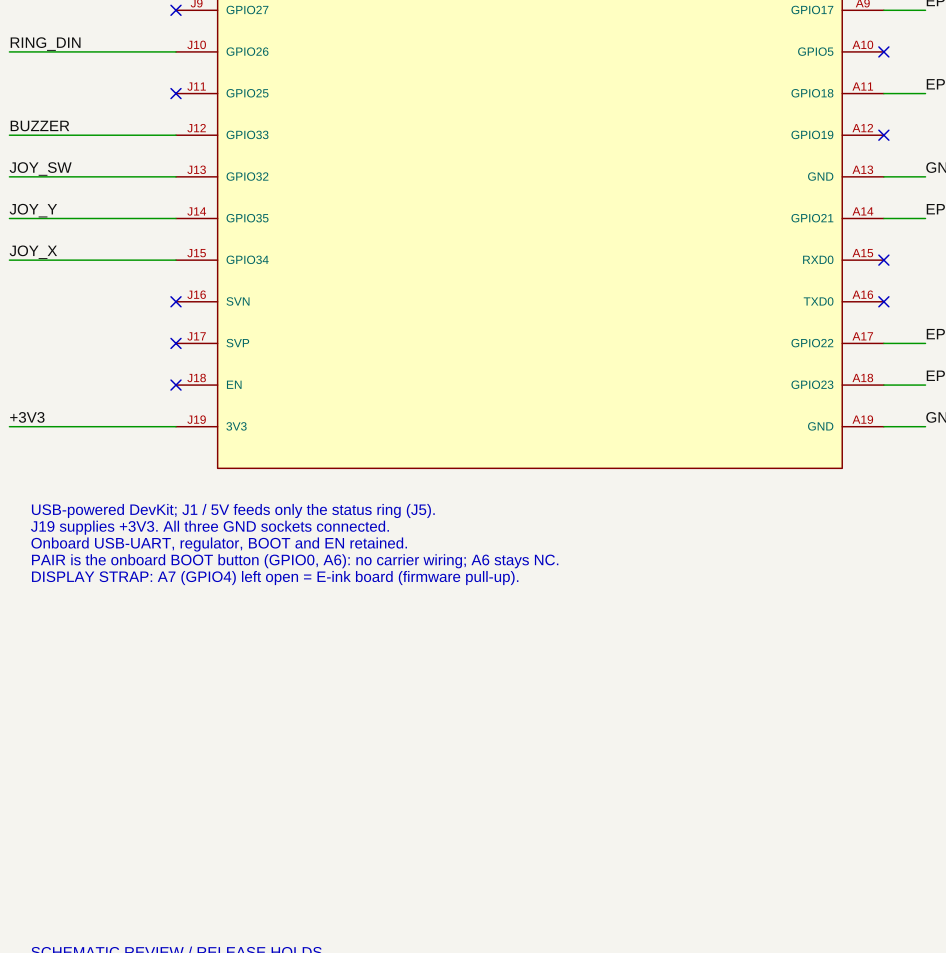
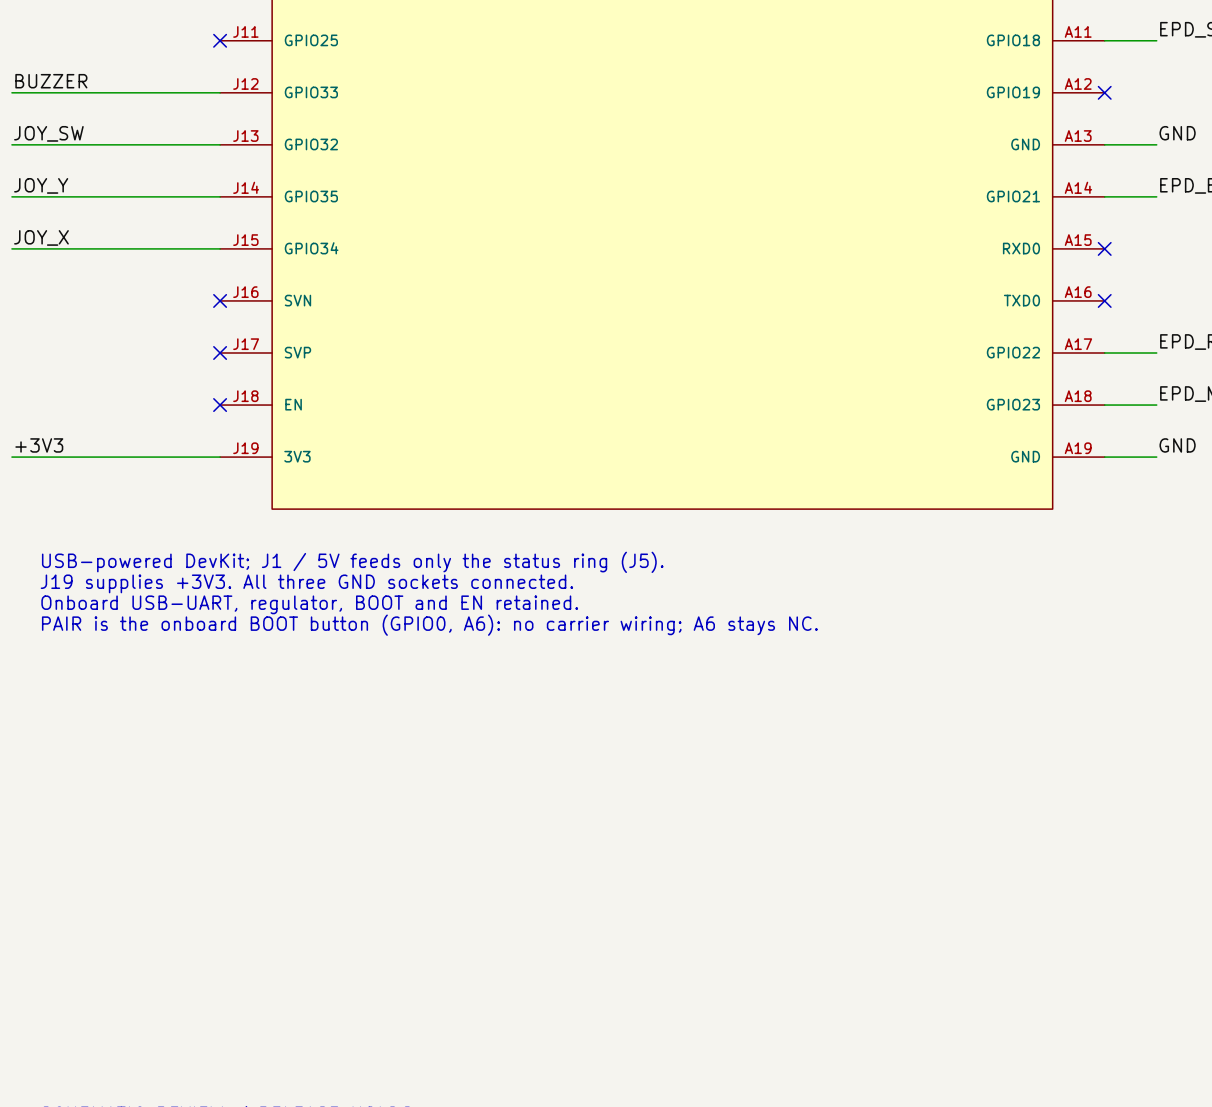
text: DISPLAY STRAP: A7 (GPIO4) left open = E-ink board (firmware pull-up). (275, 578) -> none

